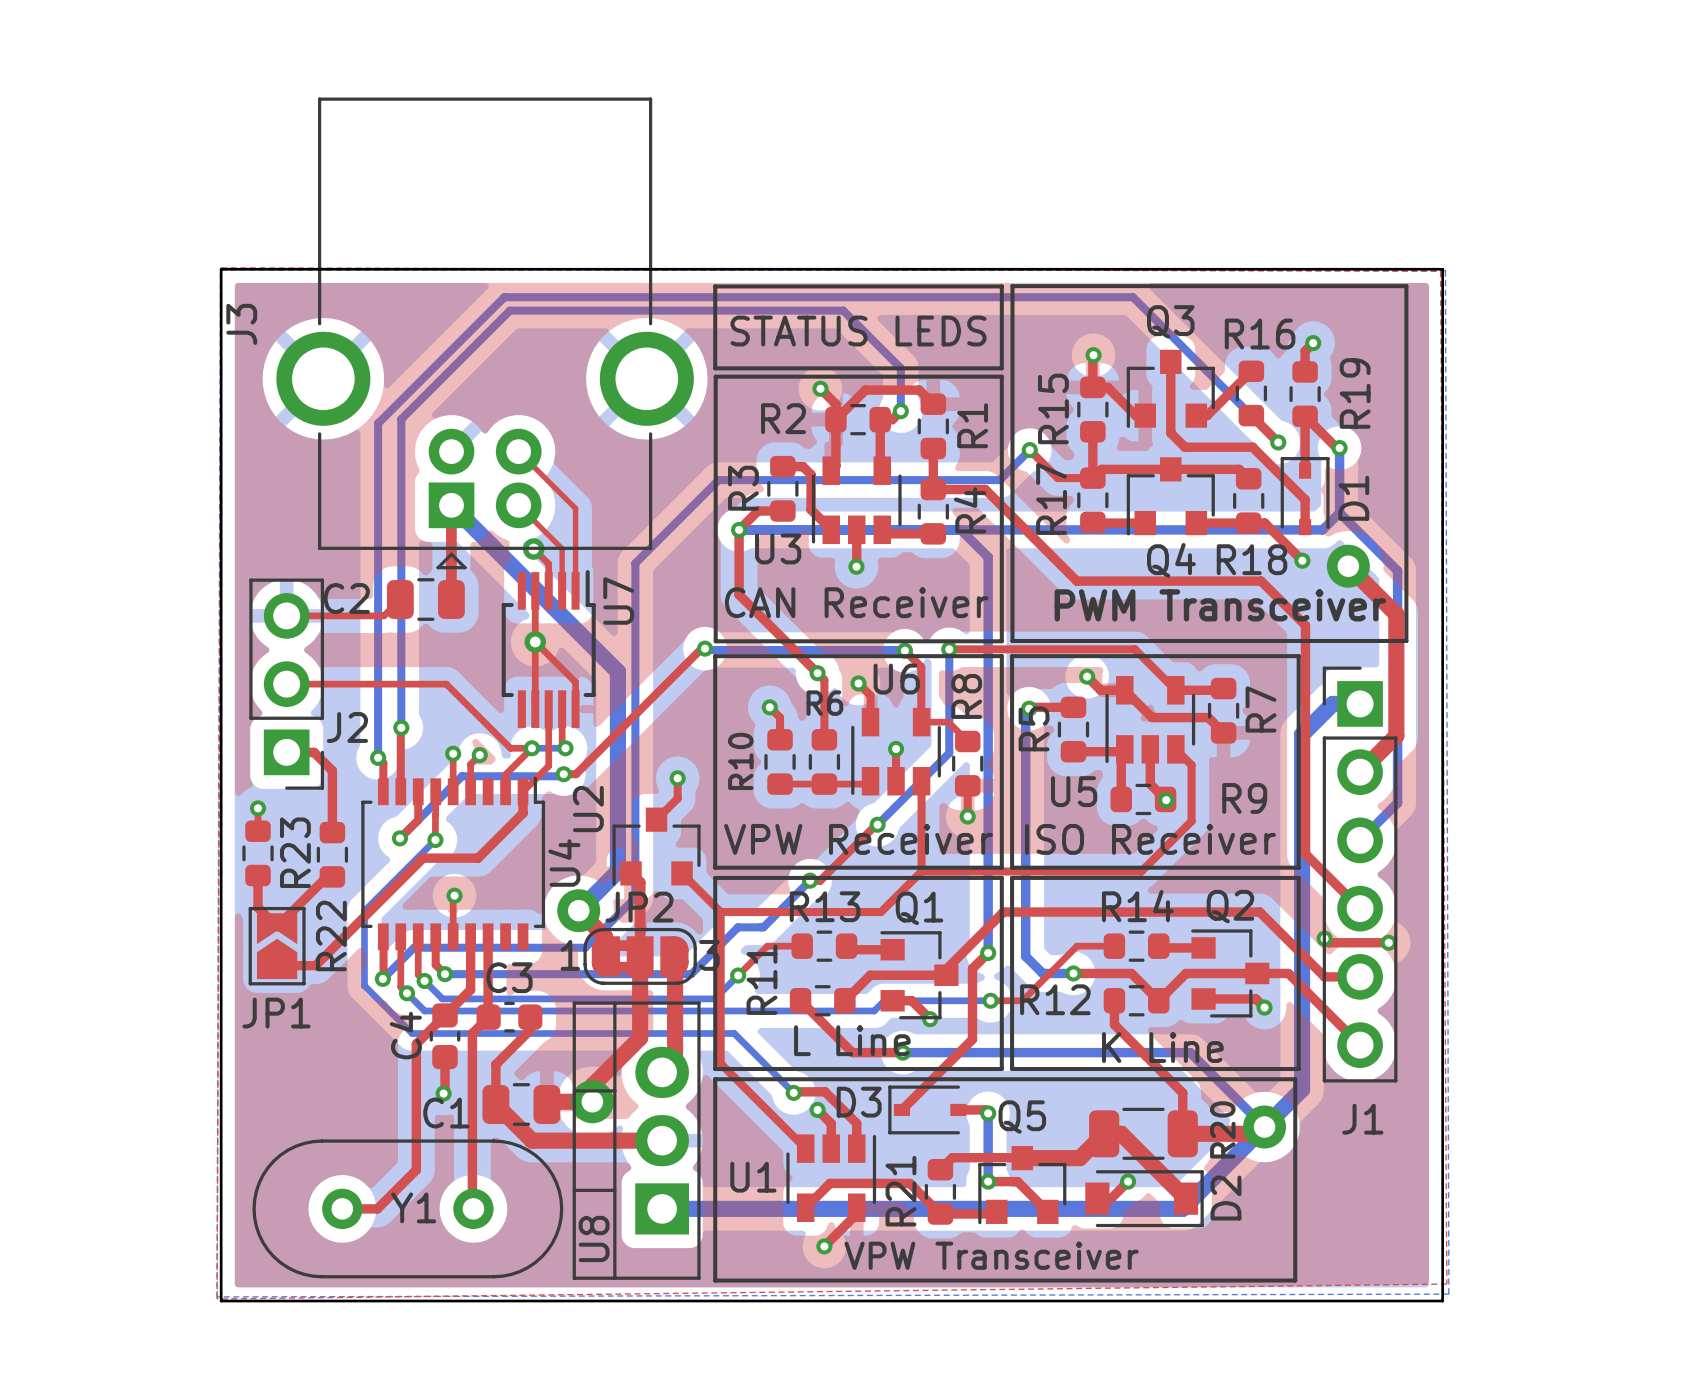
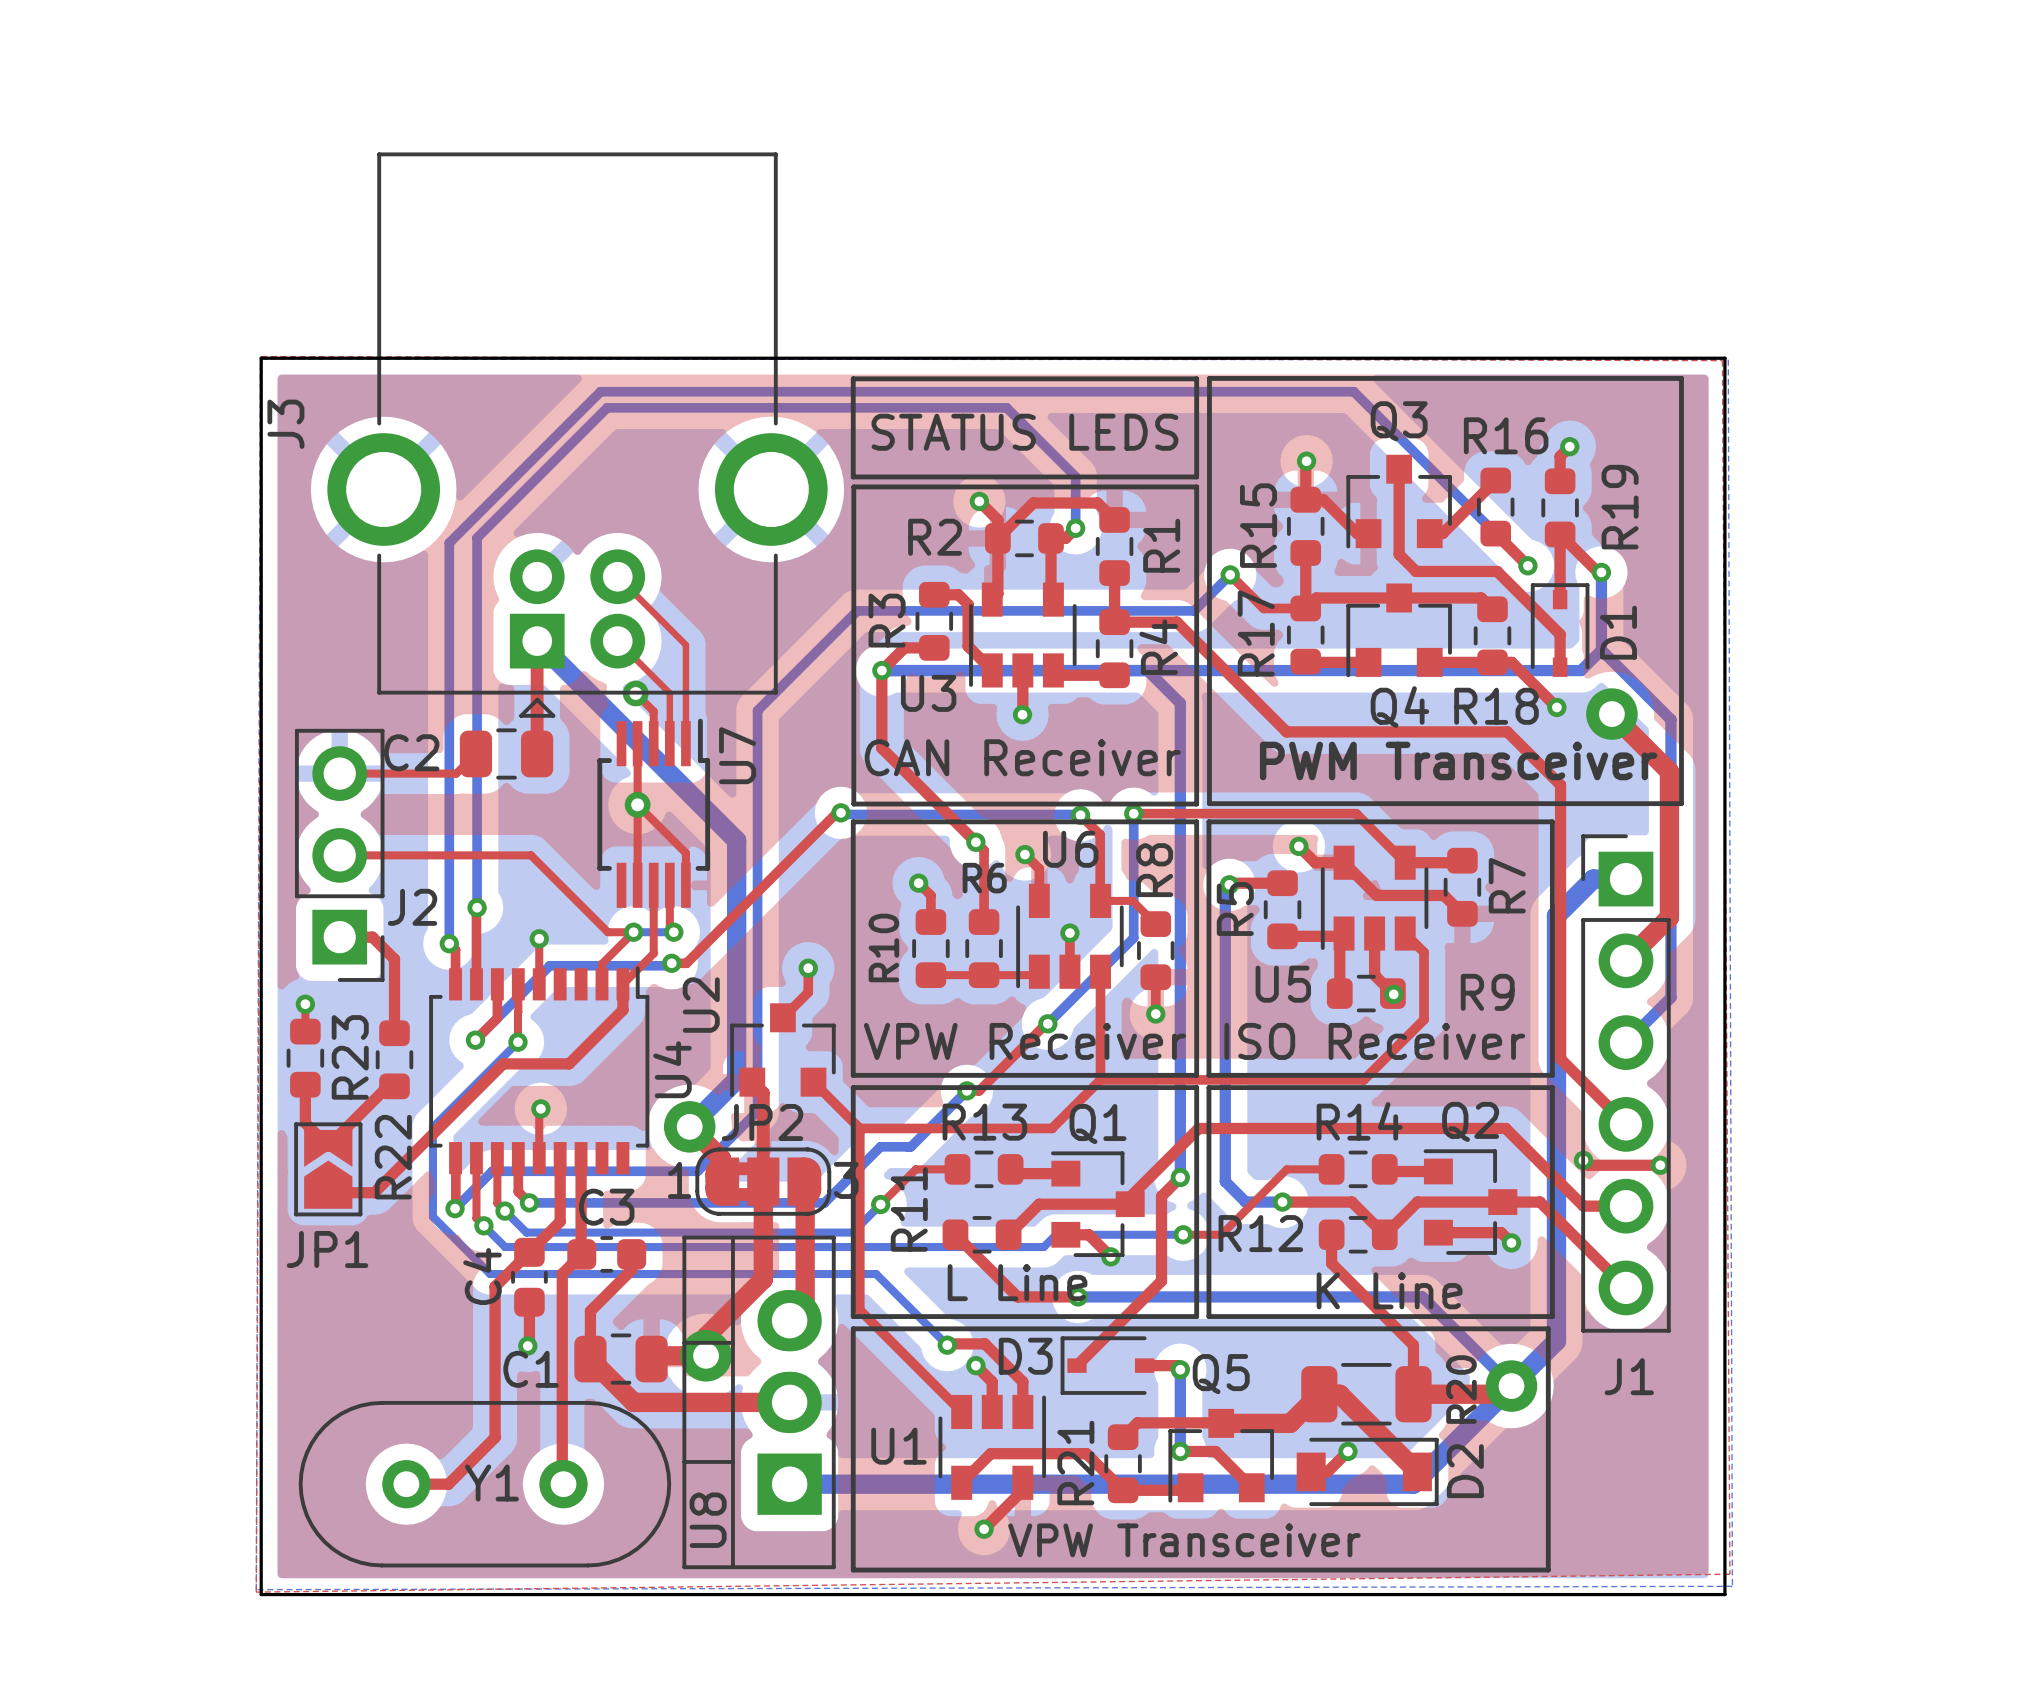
top track: (479, 755) (470, 764) (470, 791) -> none
via: (479, 755) -> none

